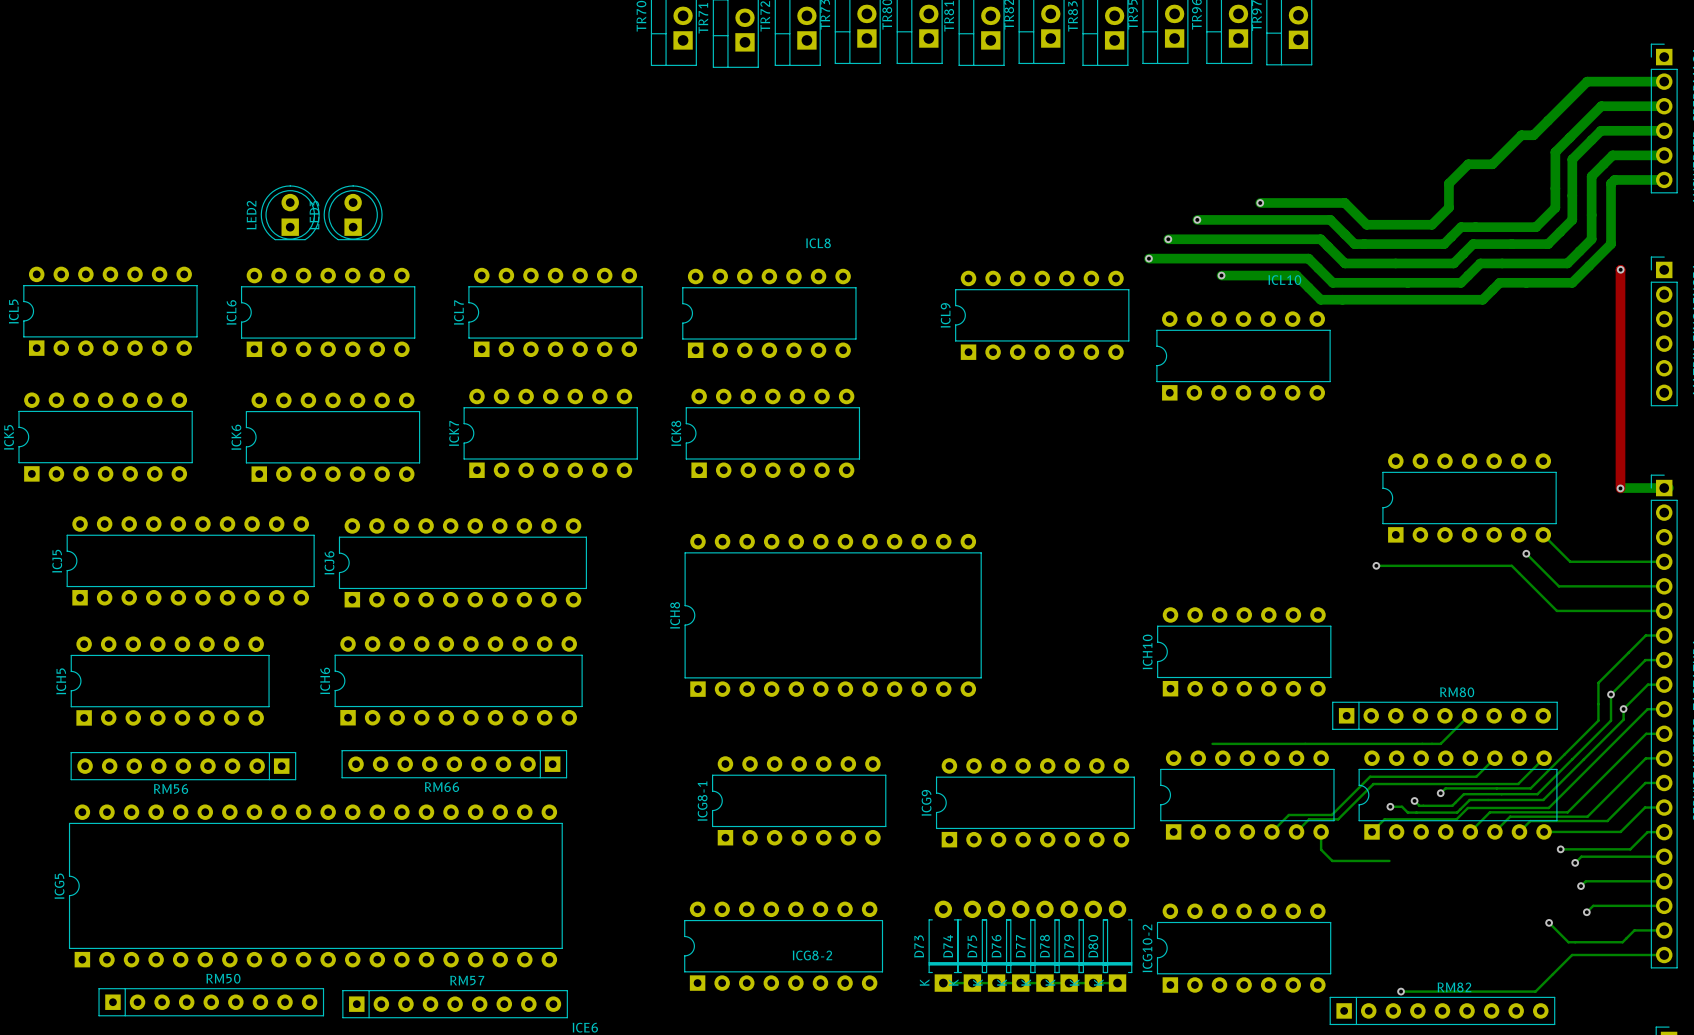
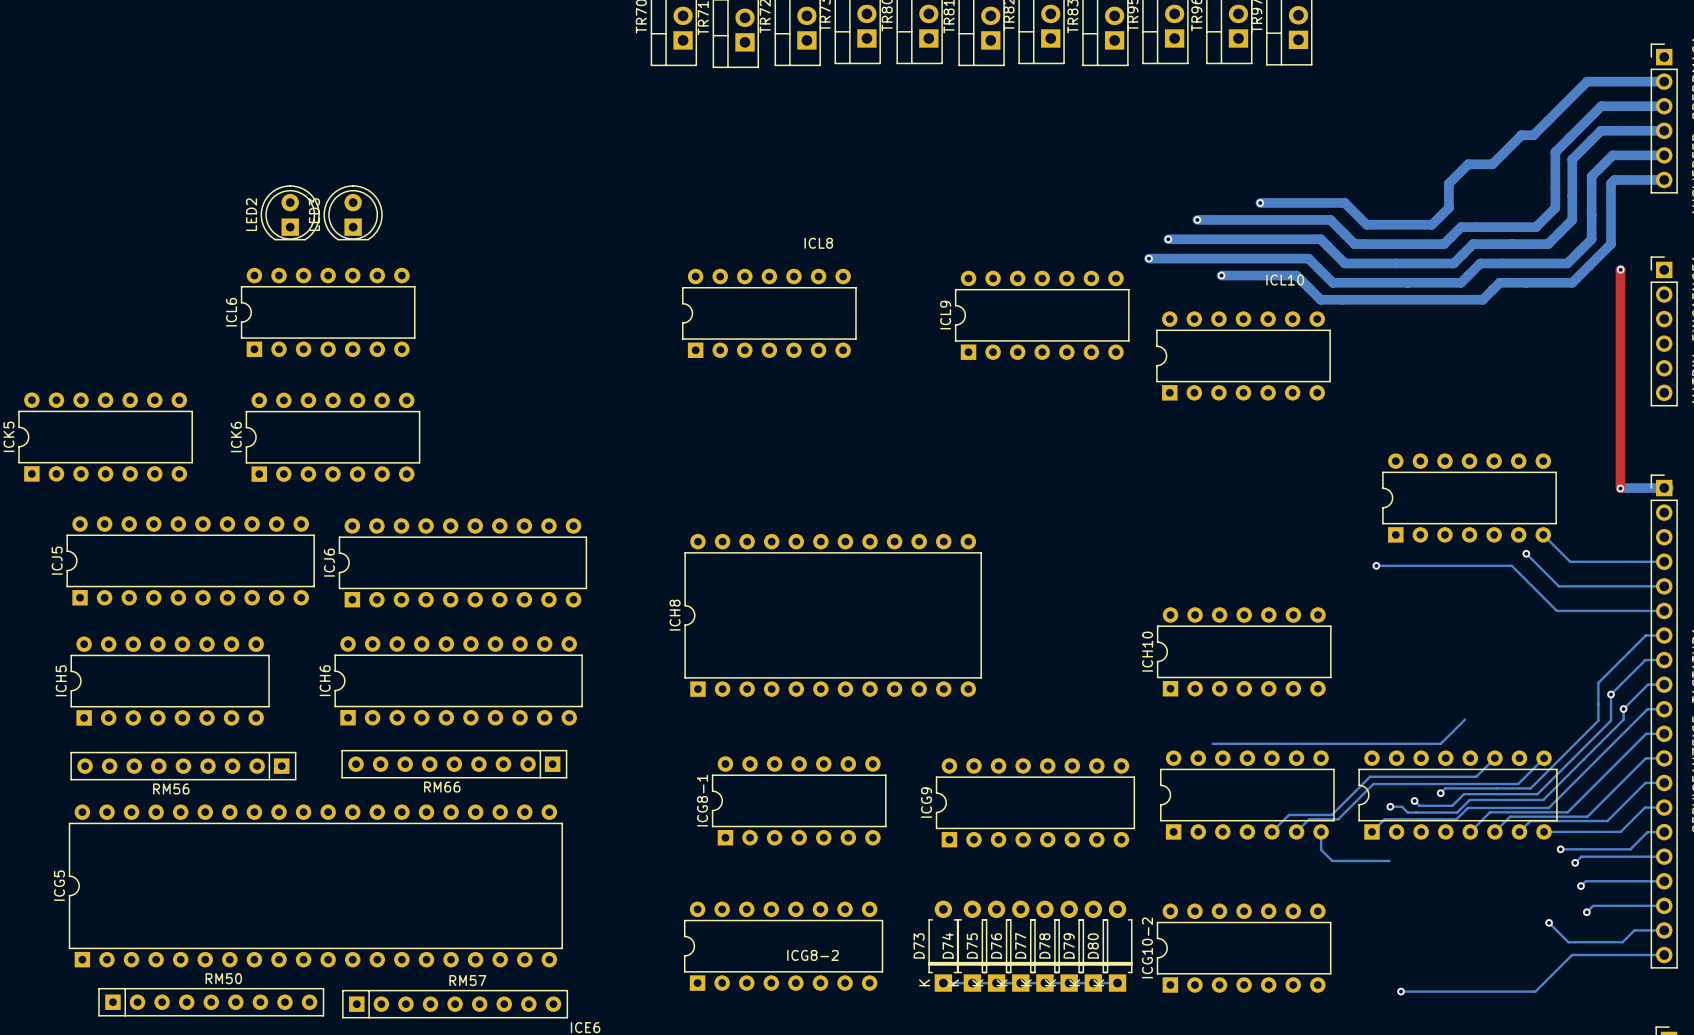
ICL5: (110, 311) -> none
ICL7: (555, 312) -> none
ICK7: (550, 433) -> none
ICK8: (772, 433) -> none
RM80: (1444, 715) -> none
RM82: (1442, 1010) -> none

